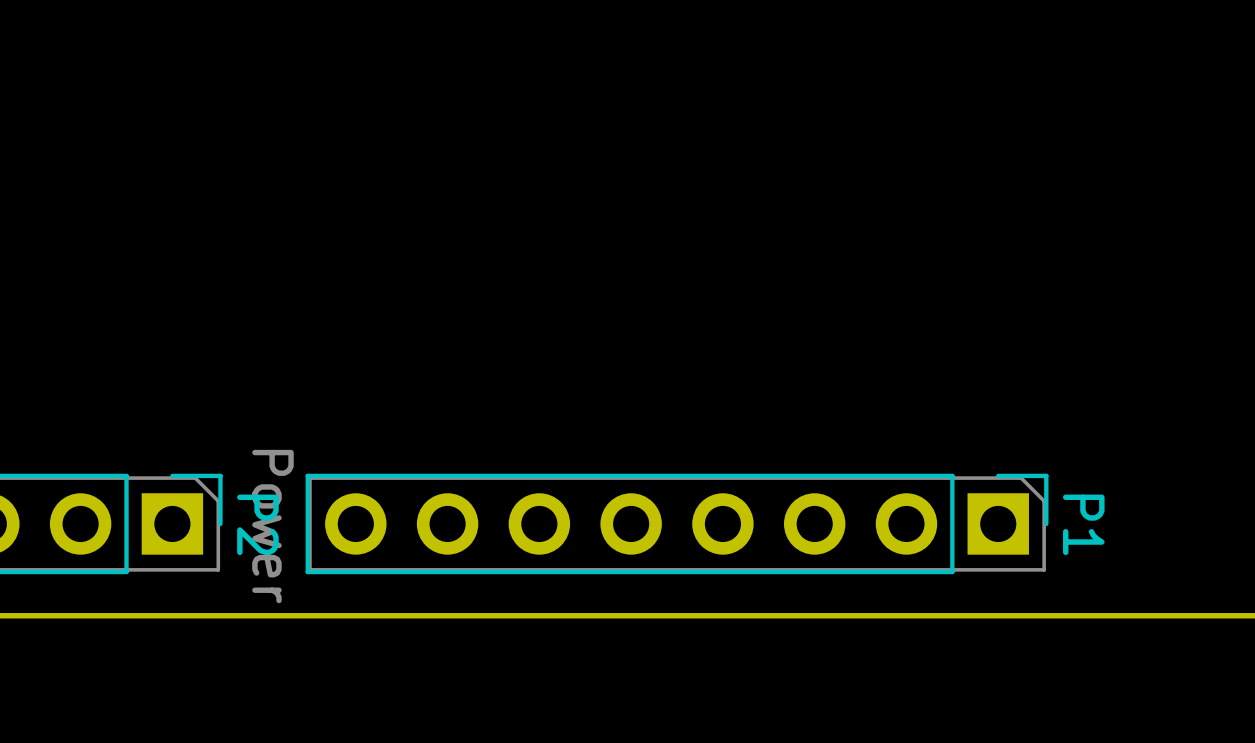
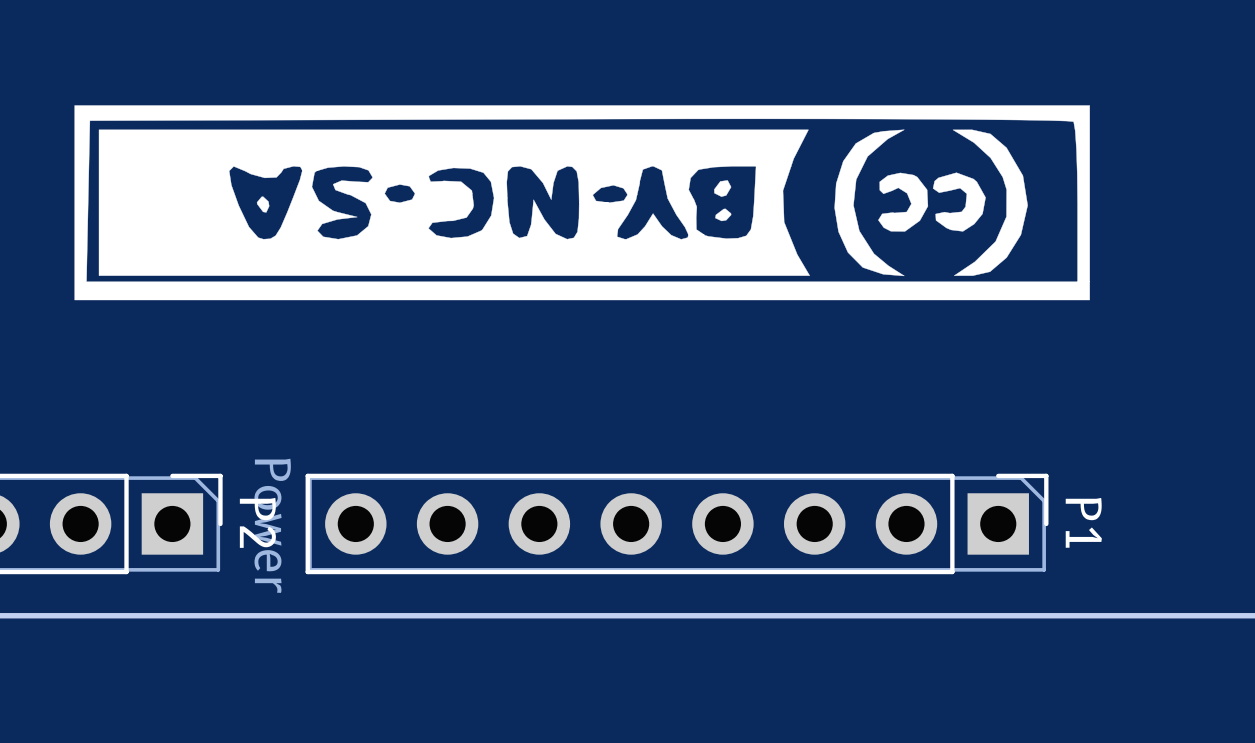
drawing: none -> [74, 105, 1090, 301]

